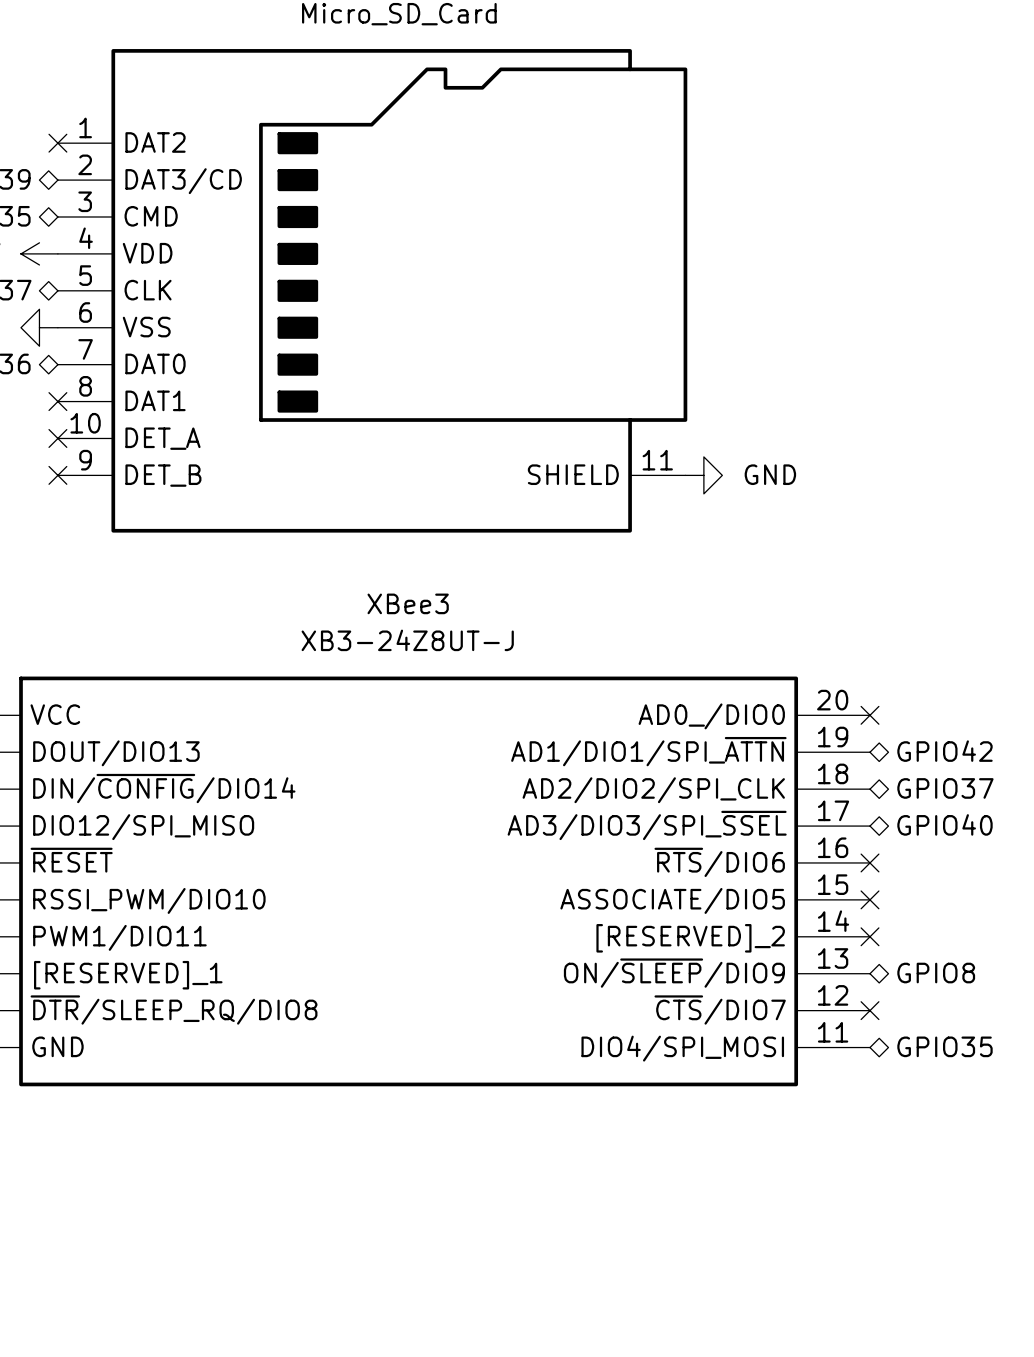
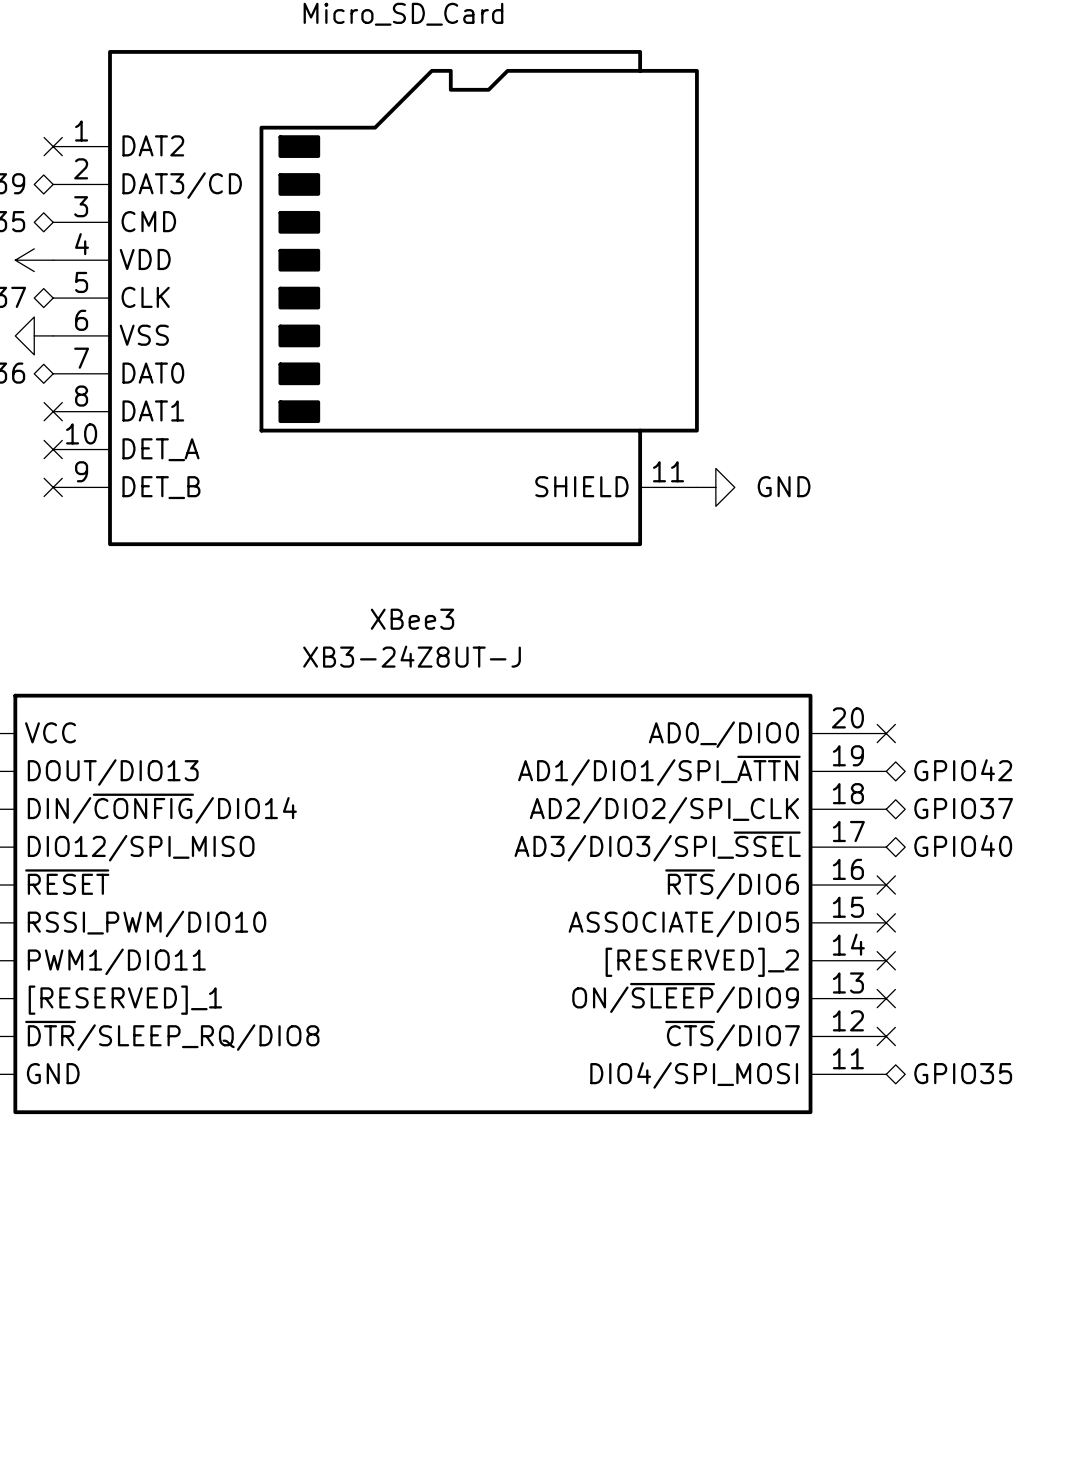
no-connect mark: none -> (886, 998)
hierarchical label: GPIO8 (936, 973) -> none

